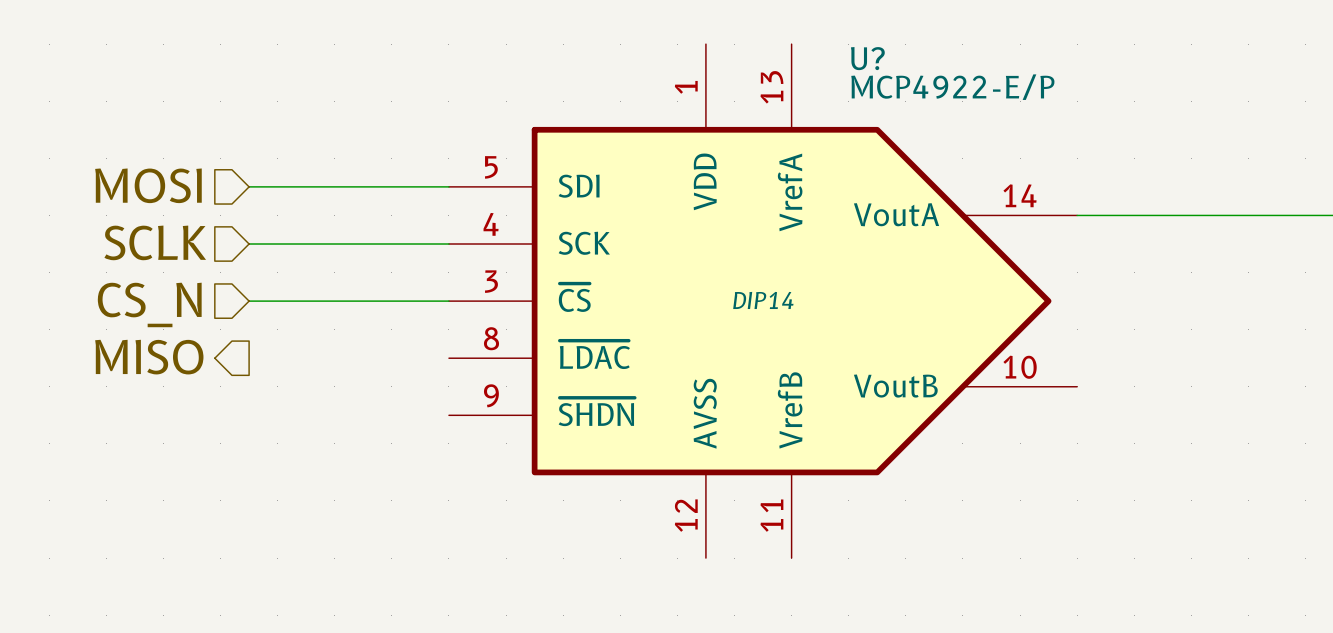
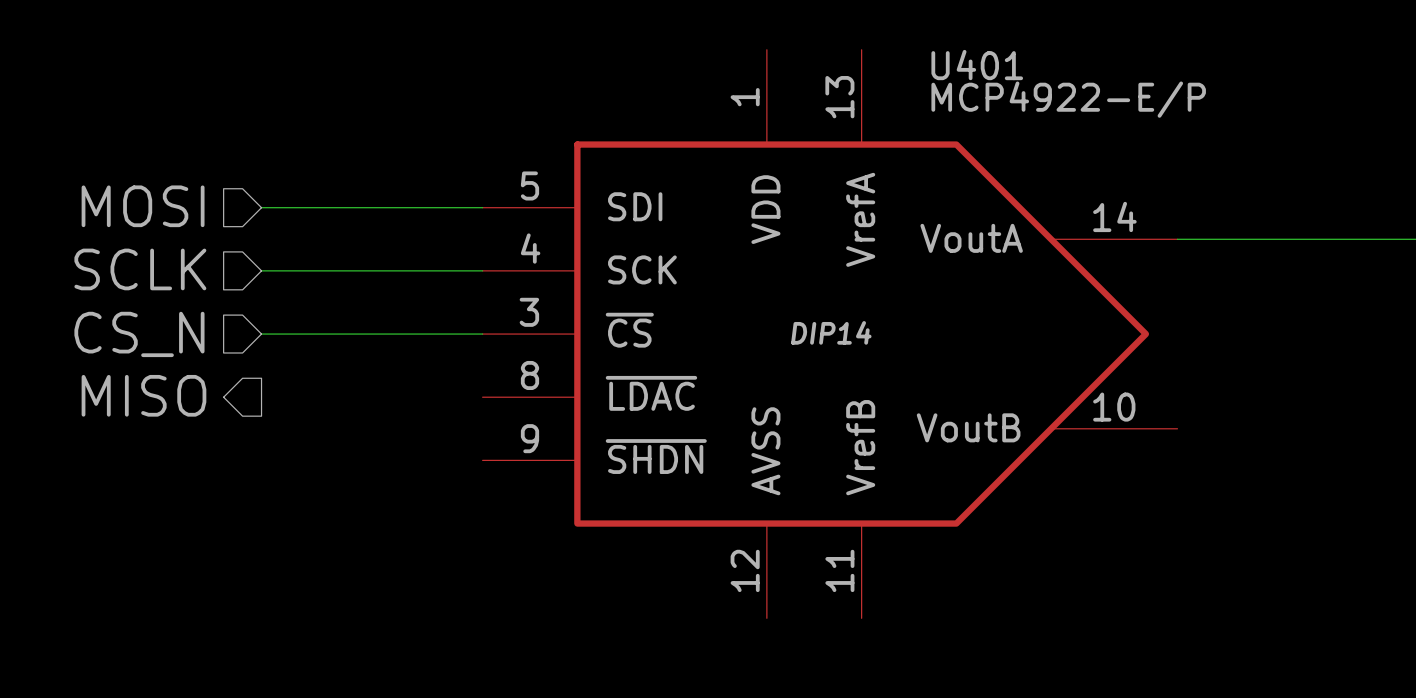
U? name: U? (867, 58) -> U401 (977, 65)

